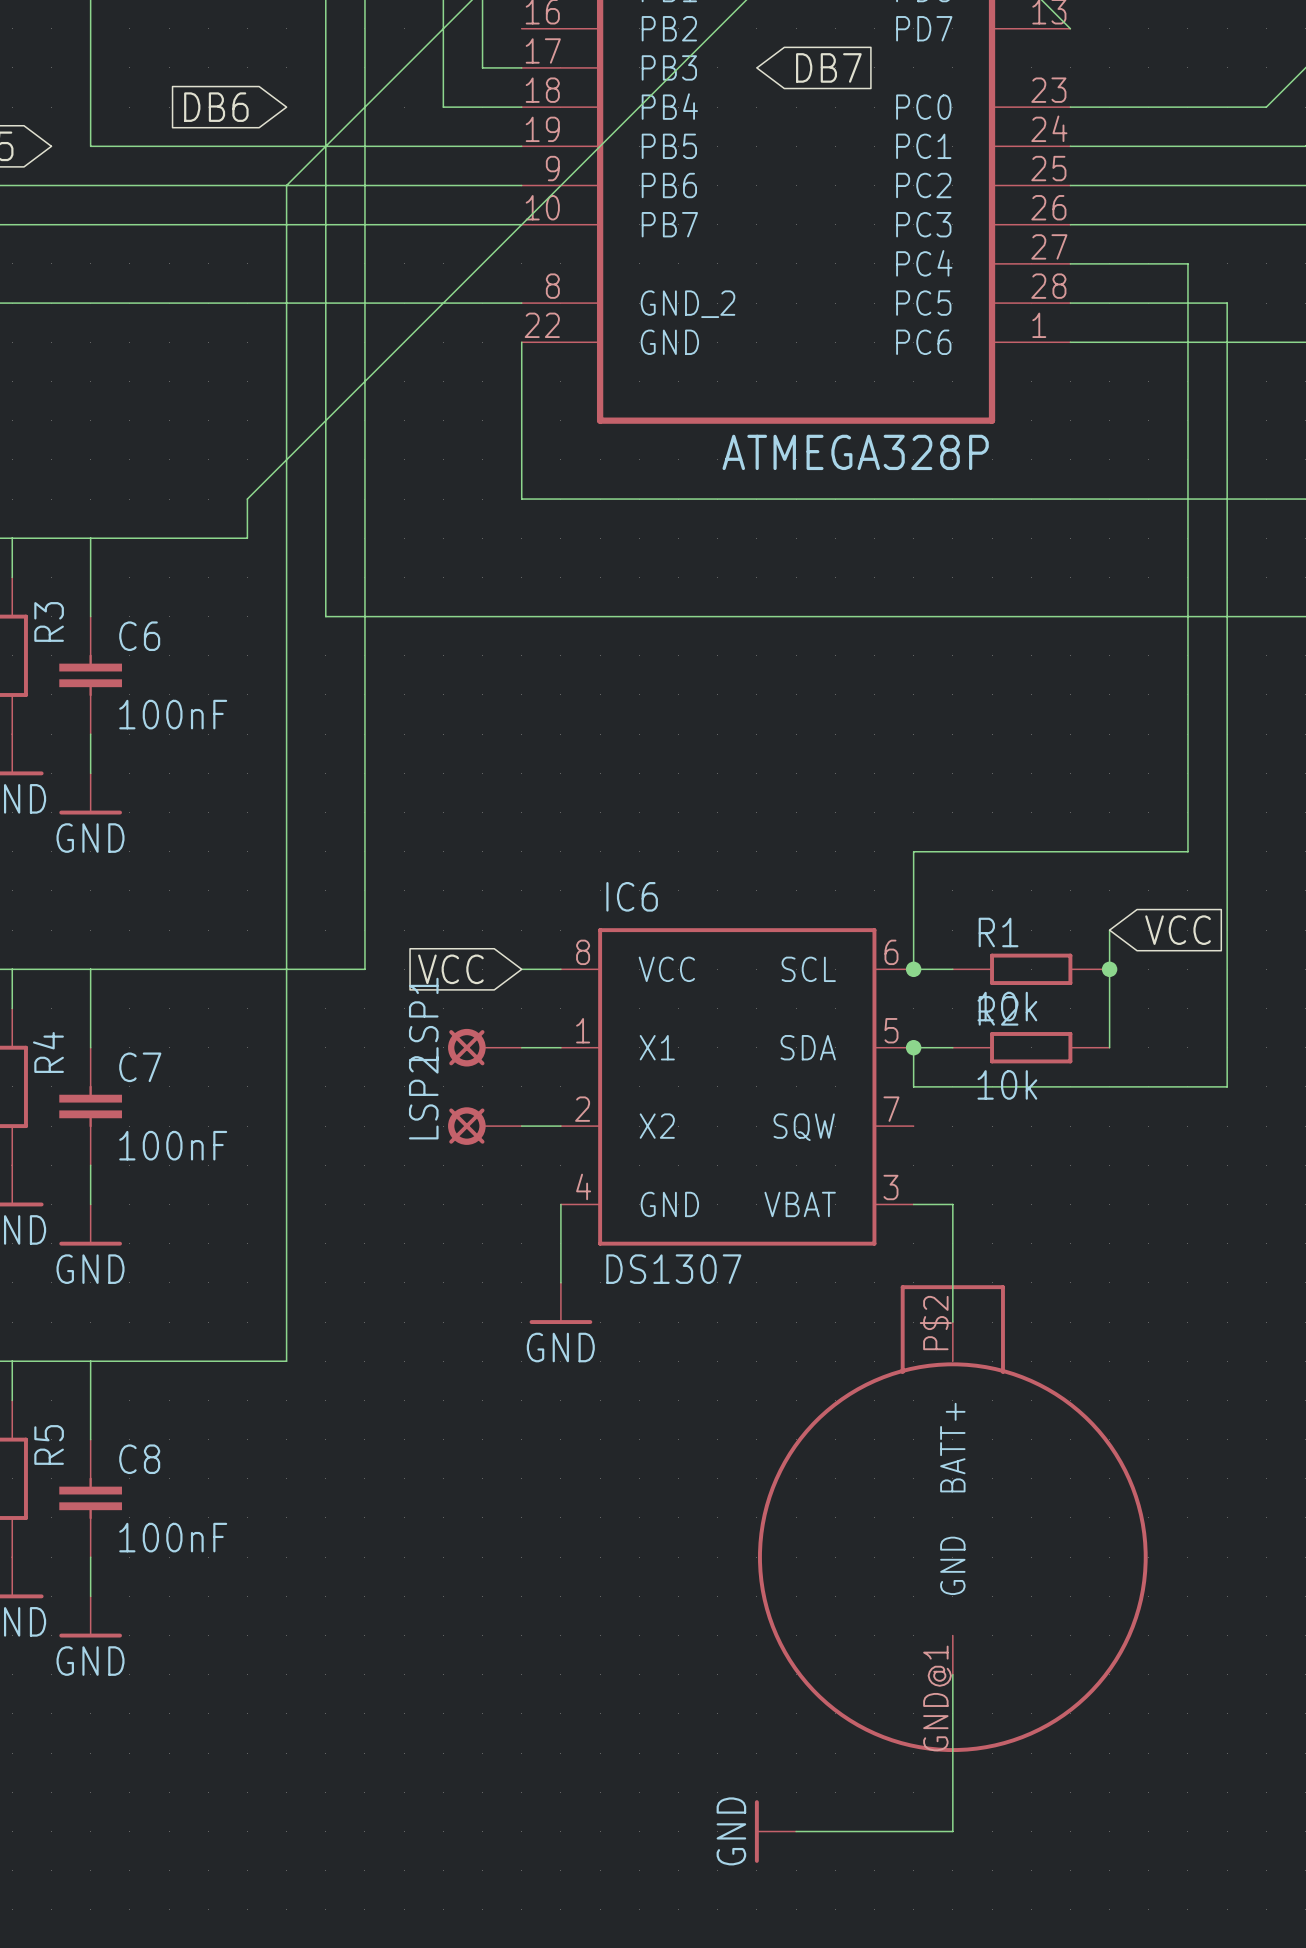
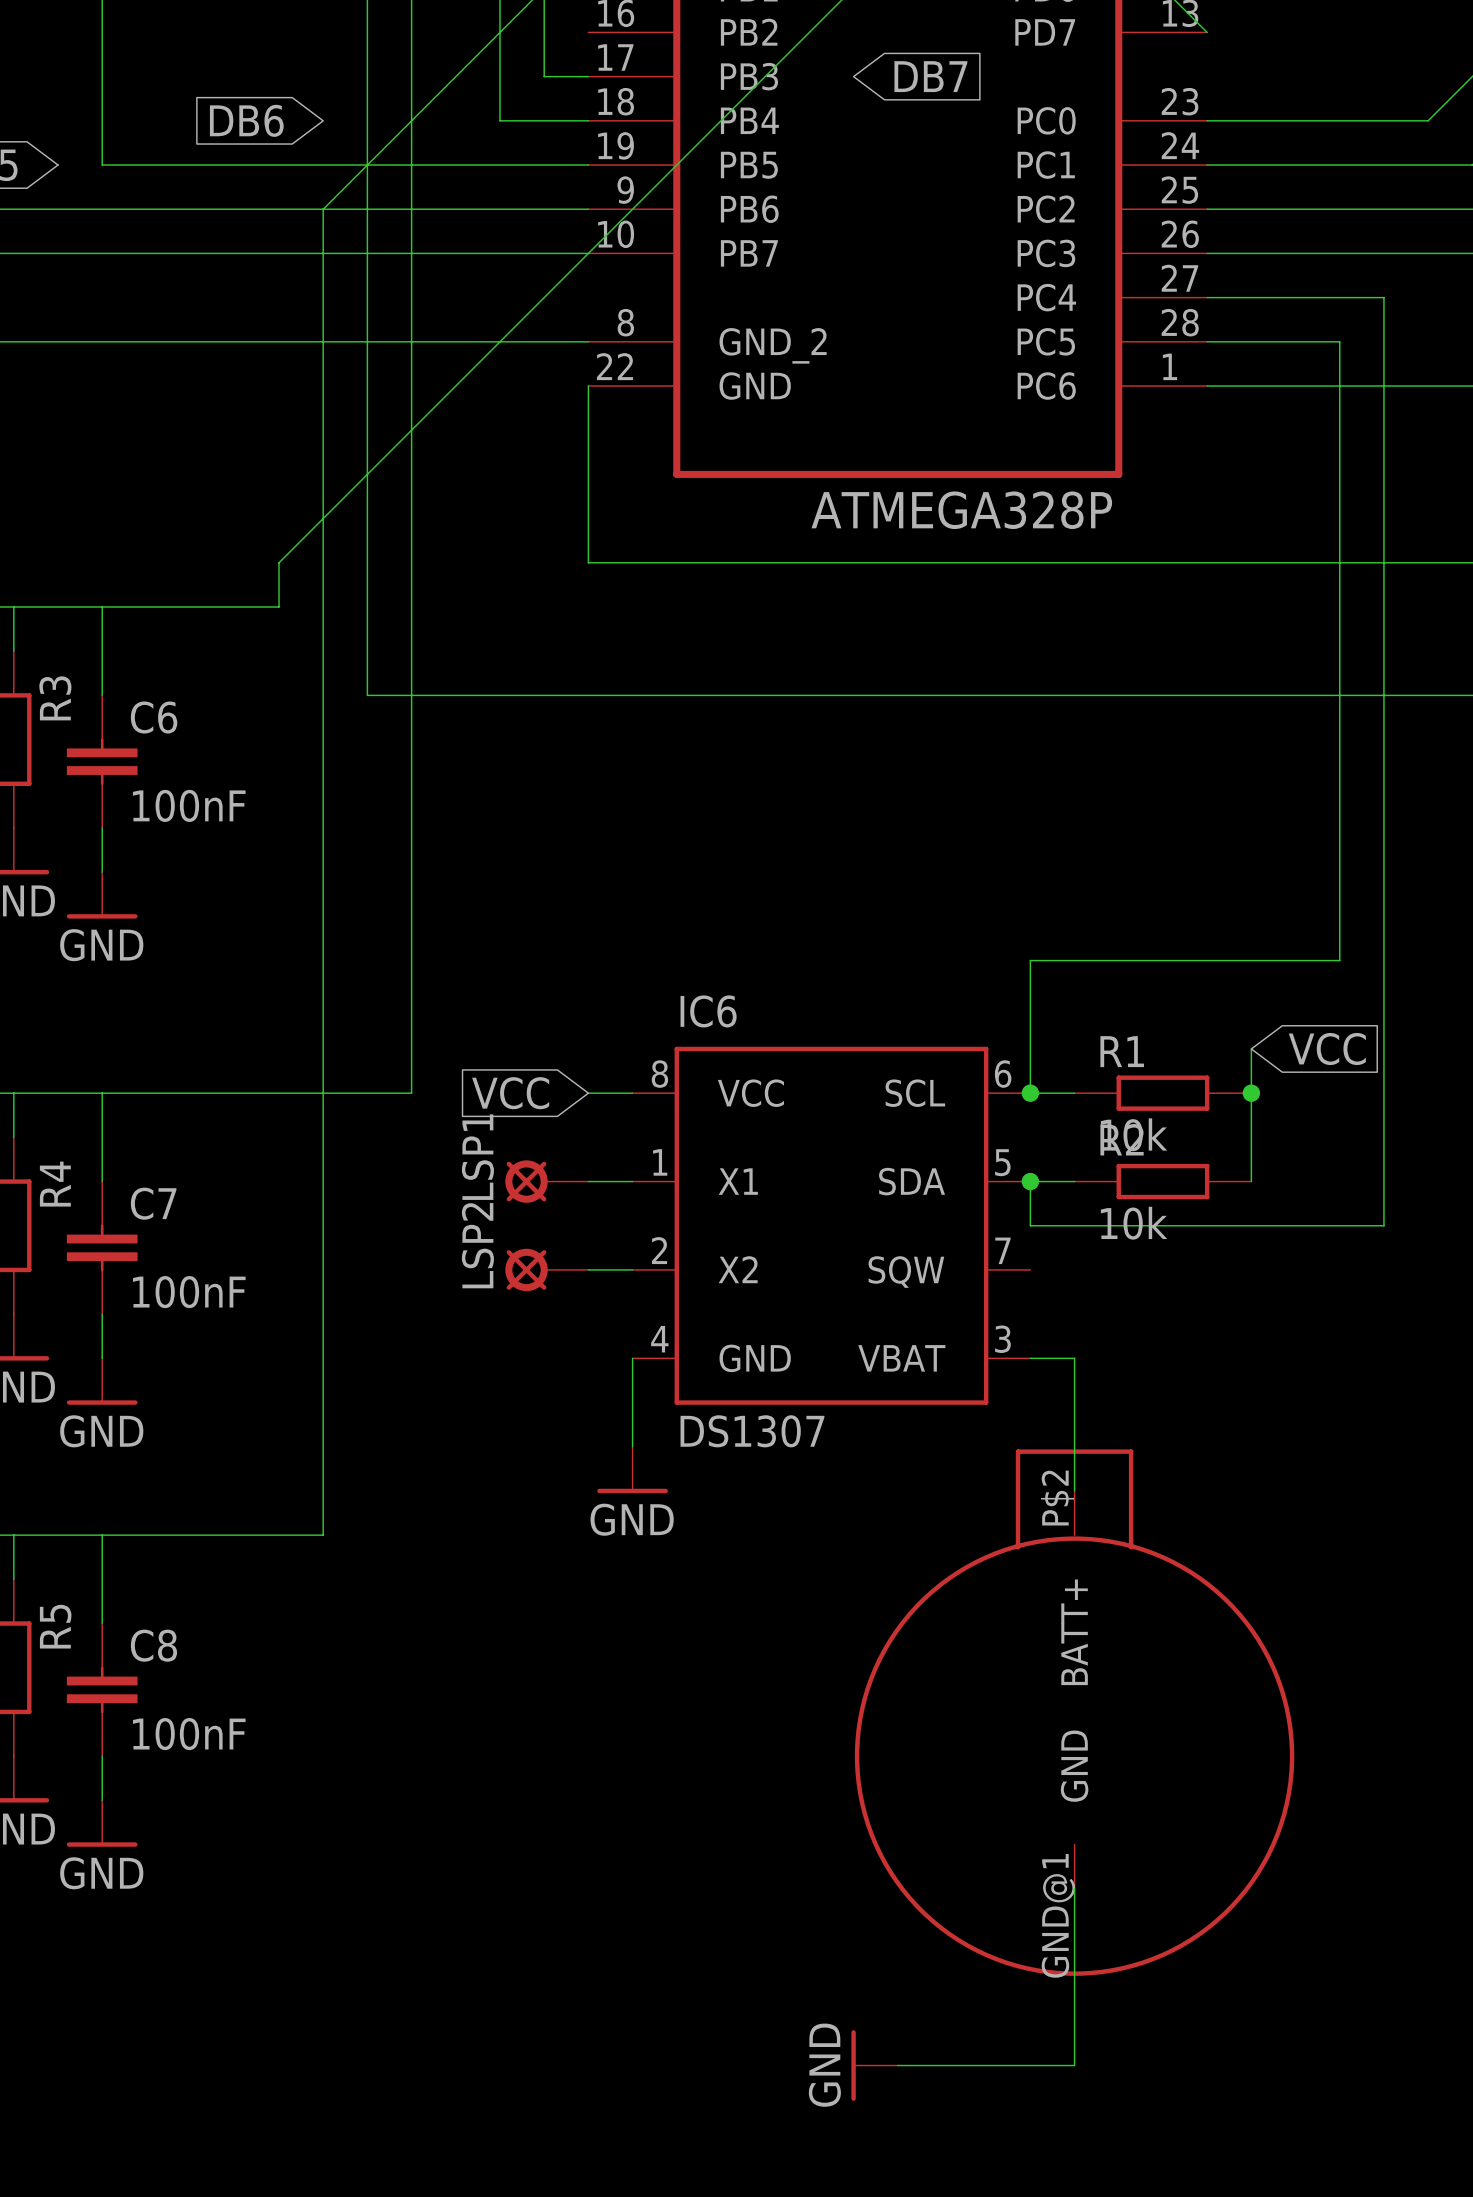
wire: (1187, 263) (1187, 303) (1227, 303) -> (1339, 297) (1383, 297) (1383, 341)

